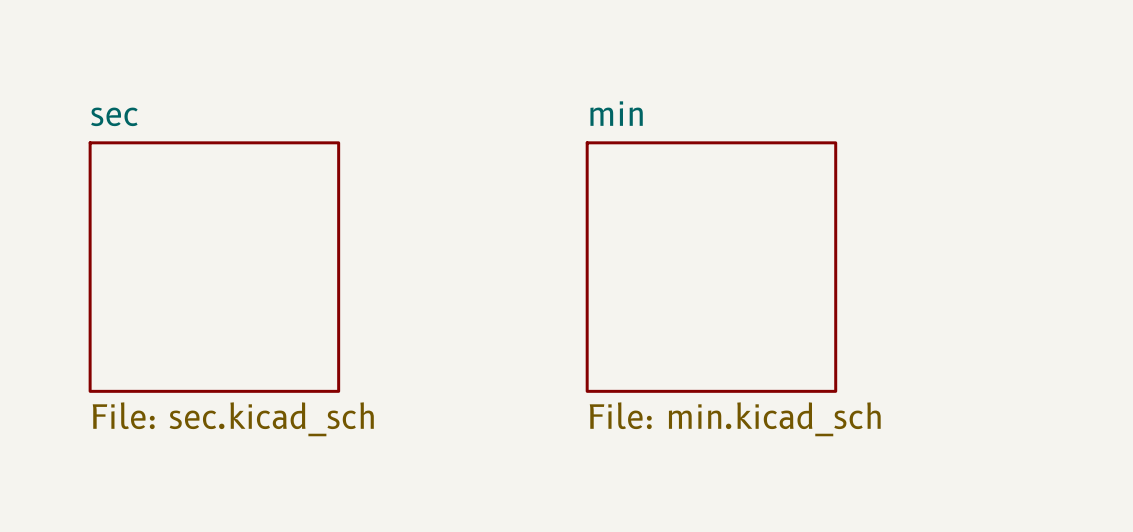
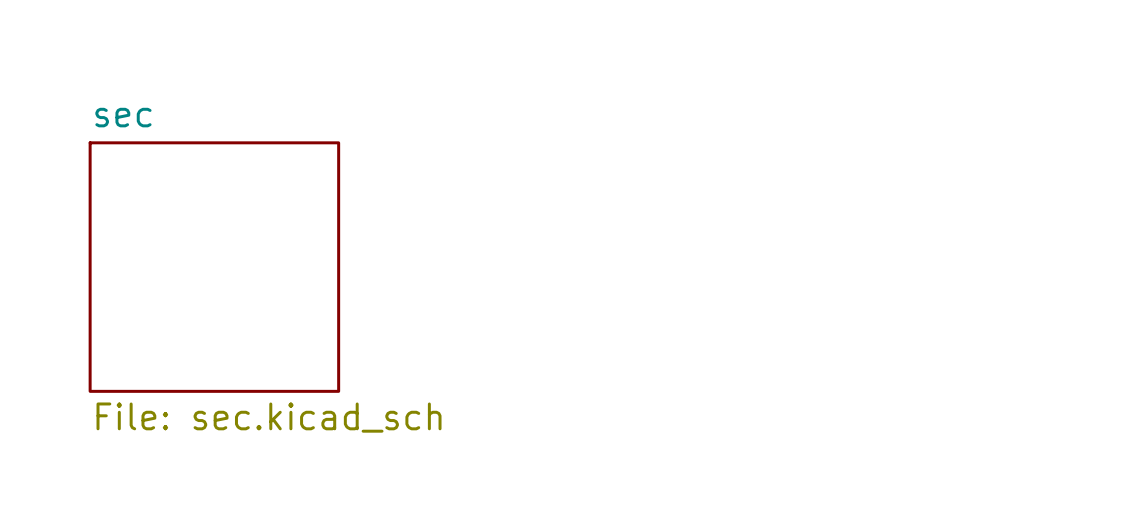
sheet min: File: min.kicad_sch (711, 267) -> none

